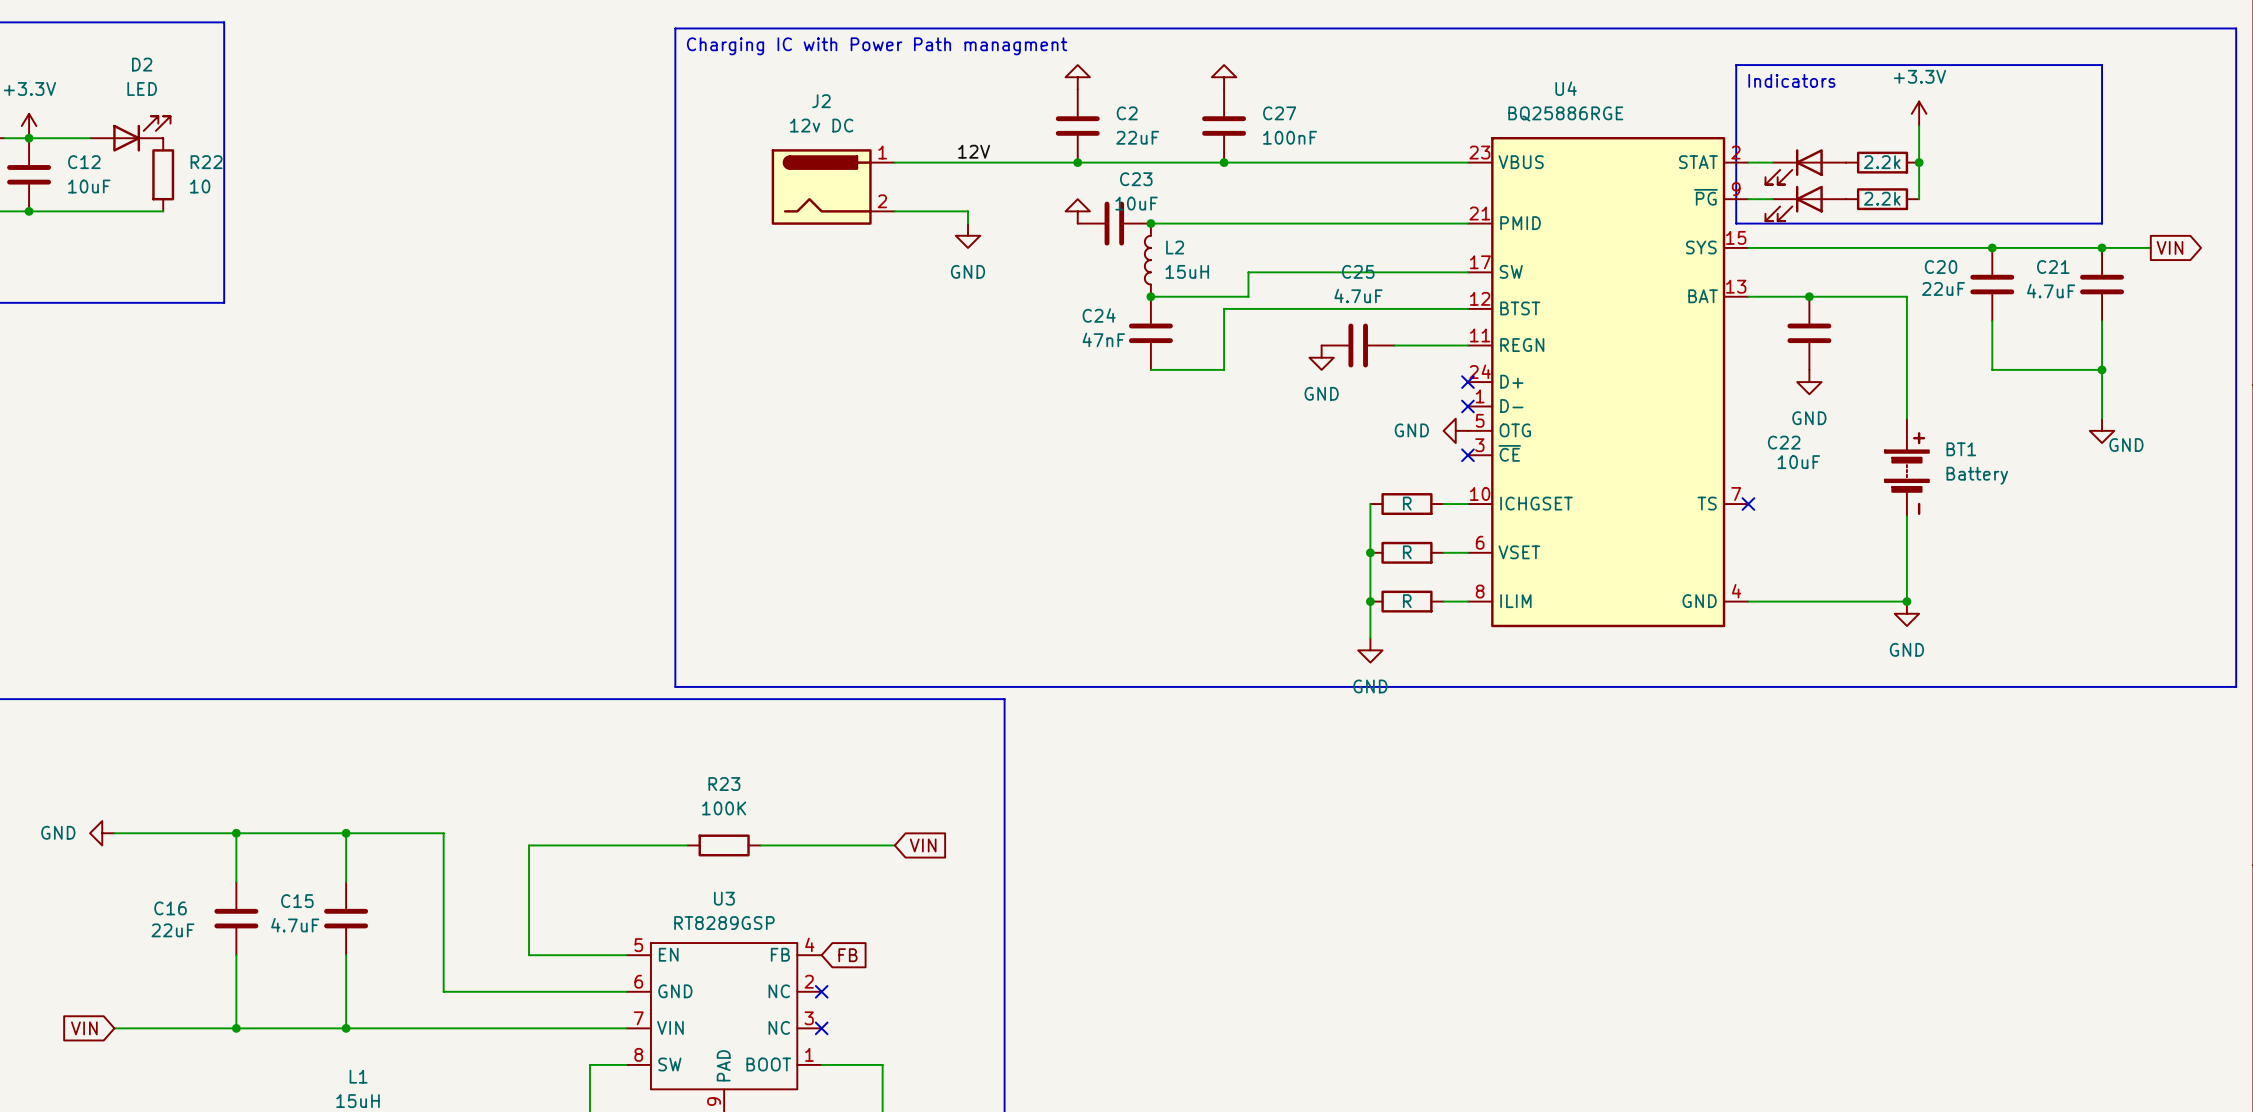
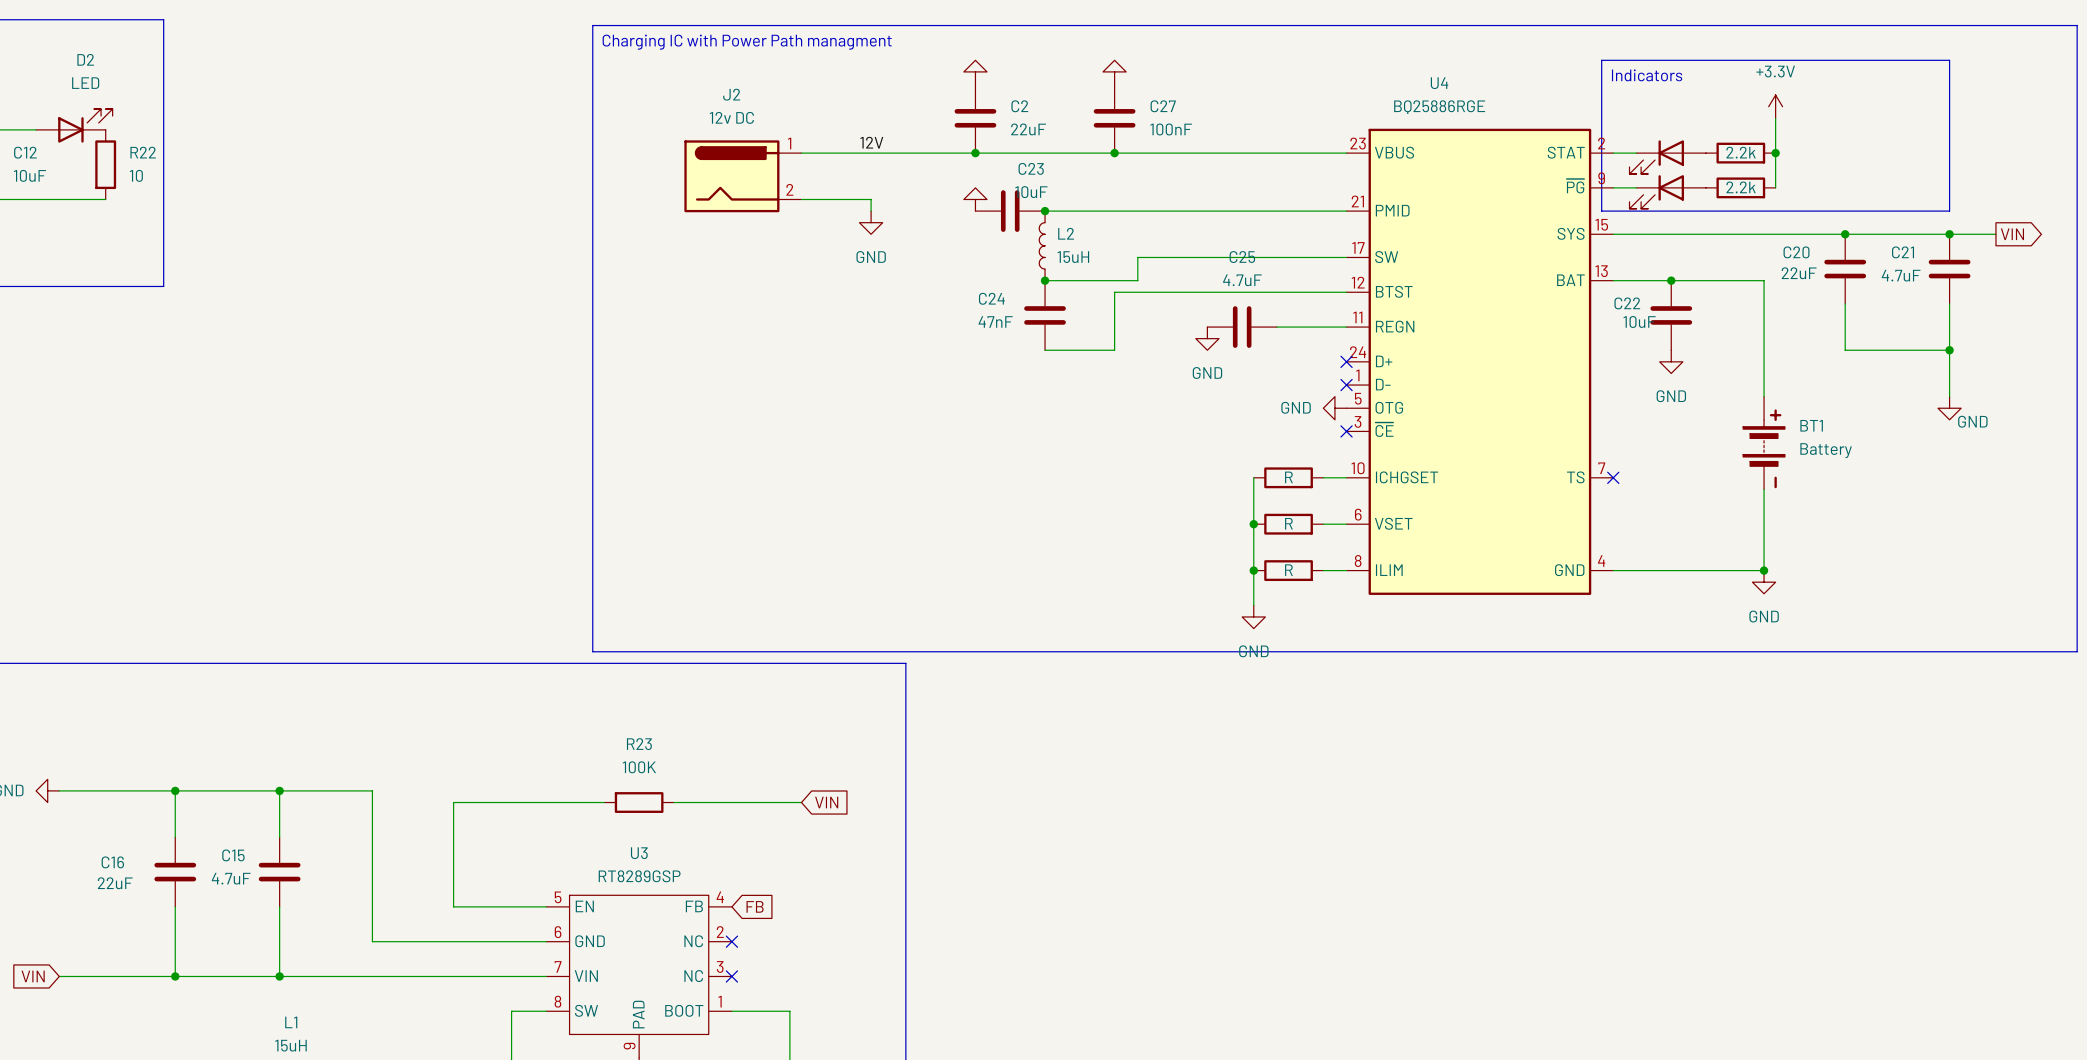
C22 name position: C22 (1784, 442) -> C22 (1627, 303)
C22 value position: 10uF (1798, 462) -> 10uF (1639, 321)

